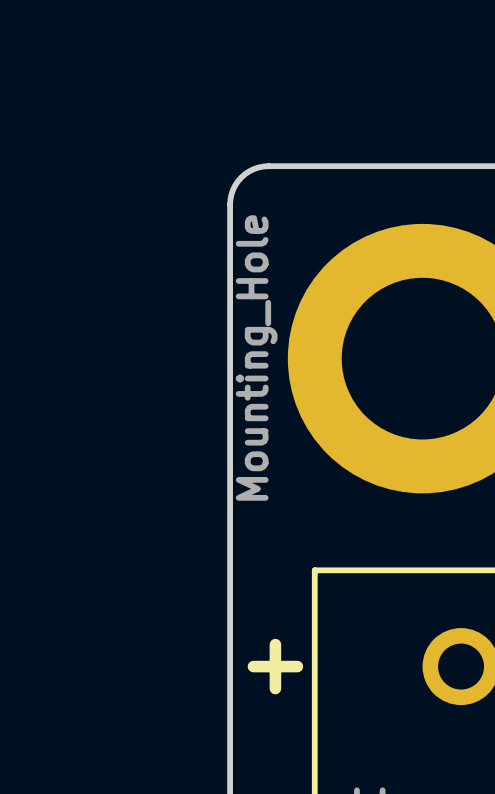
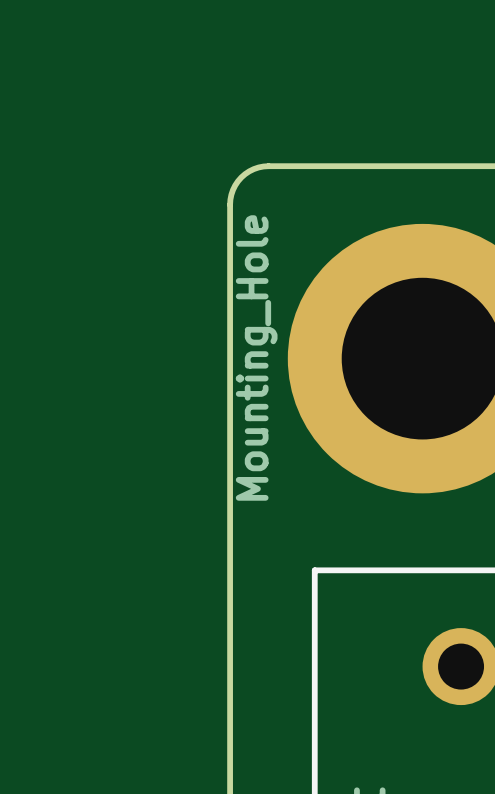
text: + (275, 666) -> none

